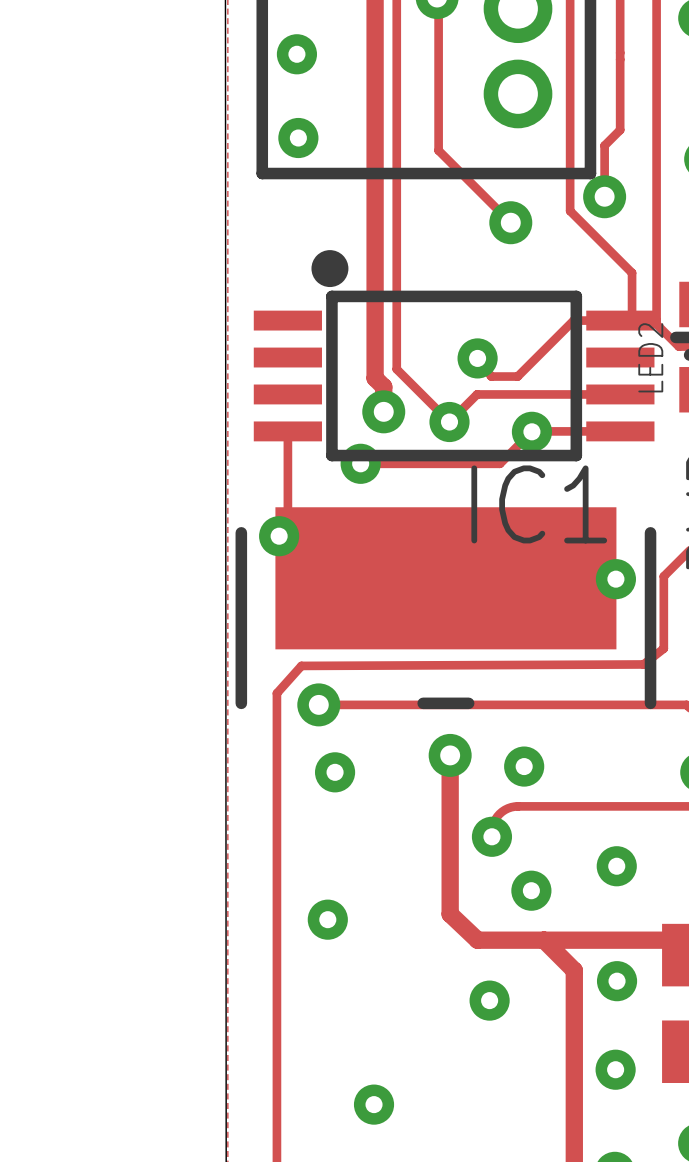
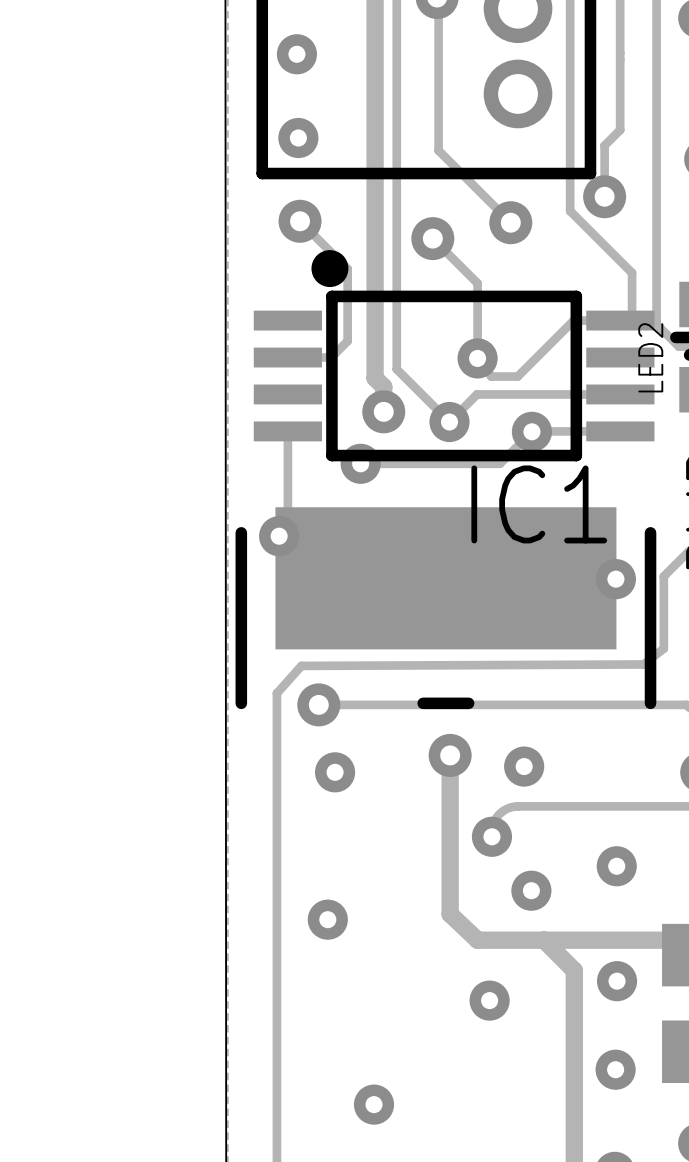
track: none -> (300, 221) (347, 268) (347, 341) (331, 357) (287, 357)
via: none -> (300, 221)
track: none -> (432, 238) (477, 283) (477, 358)
via: none -> (432, 238)

